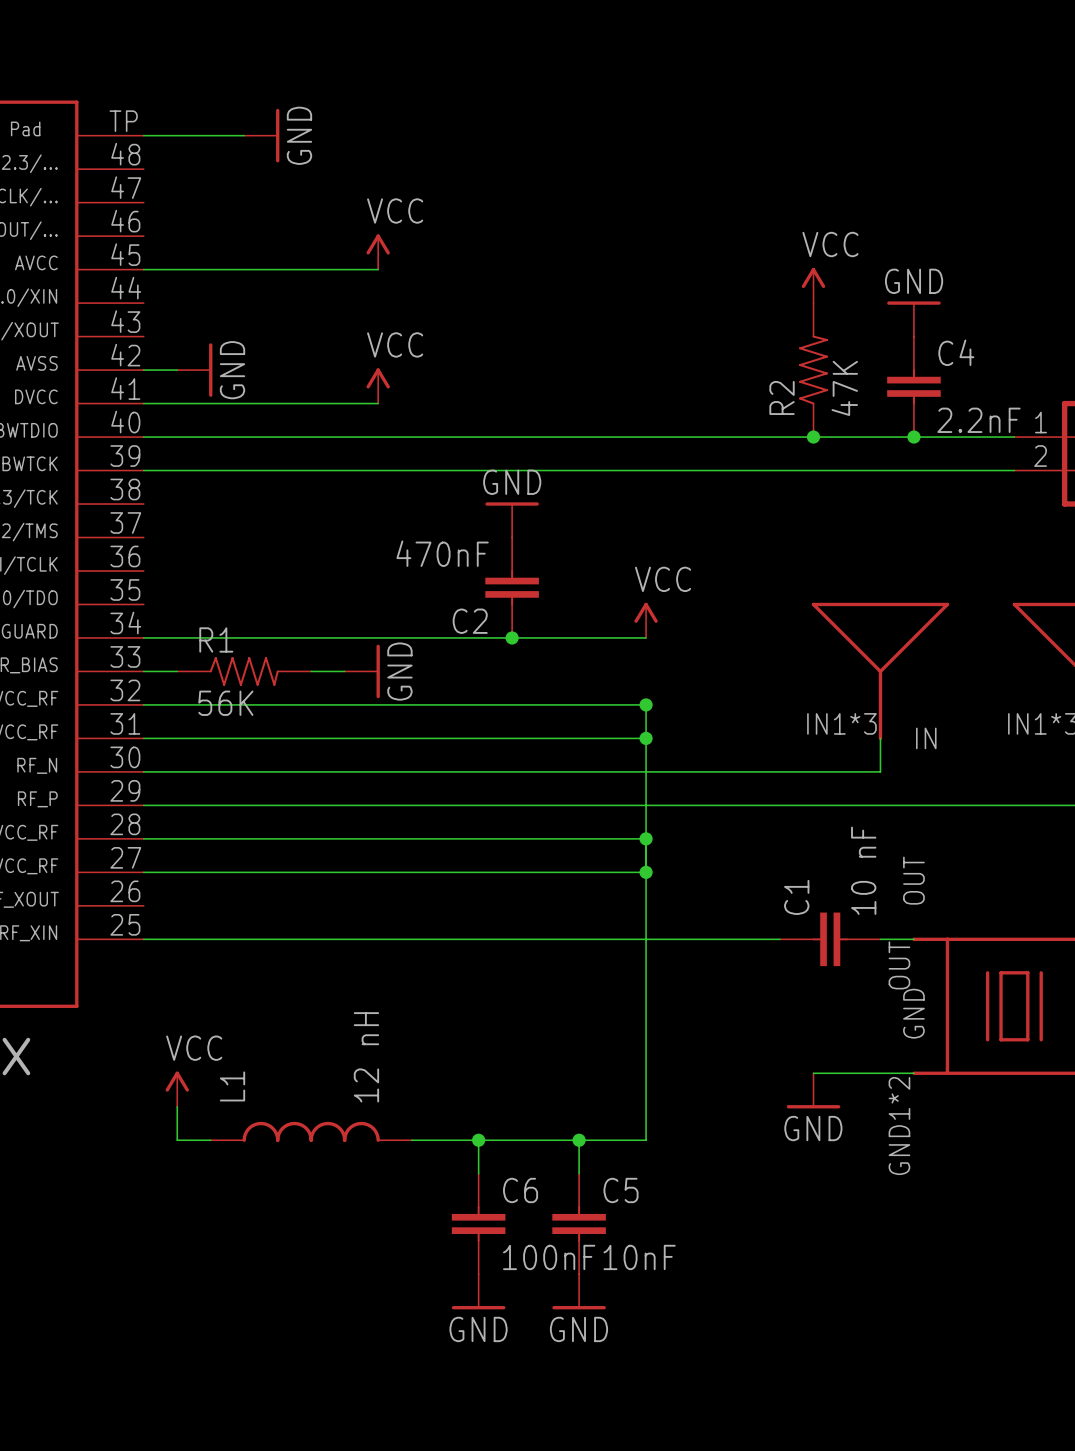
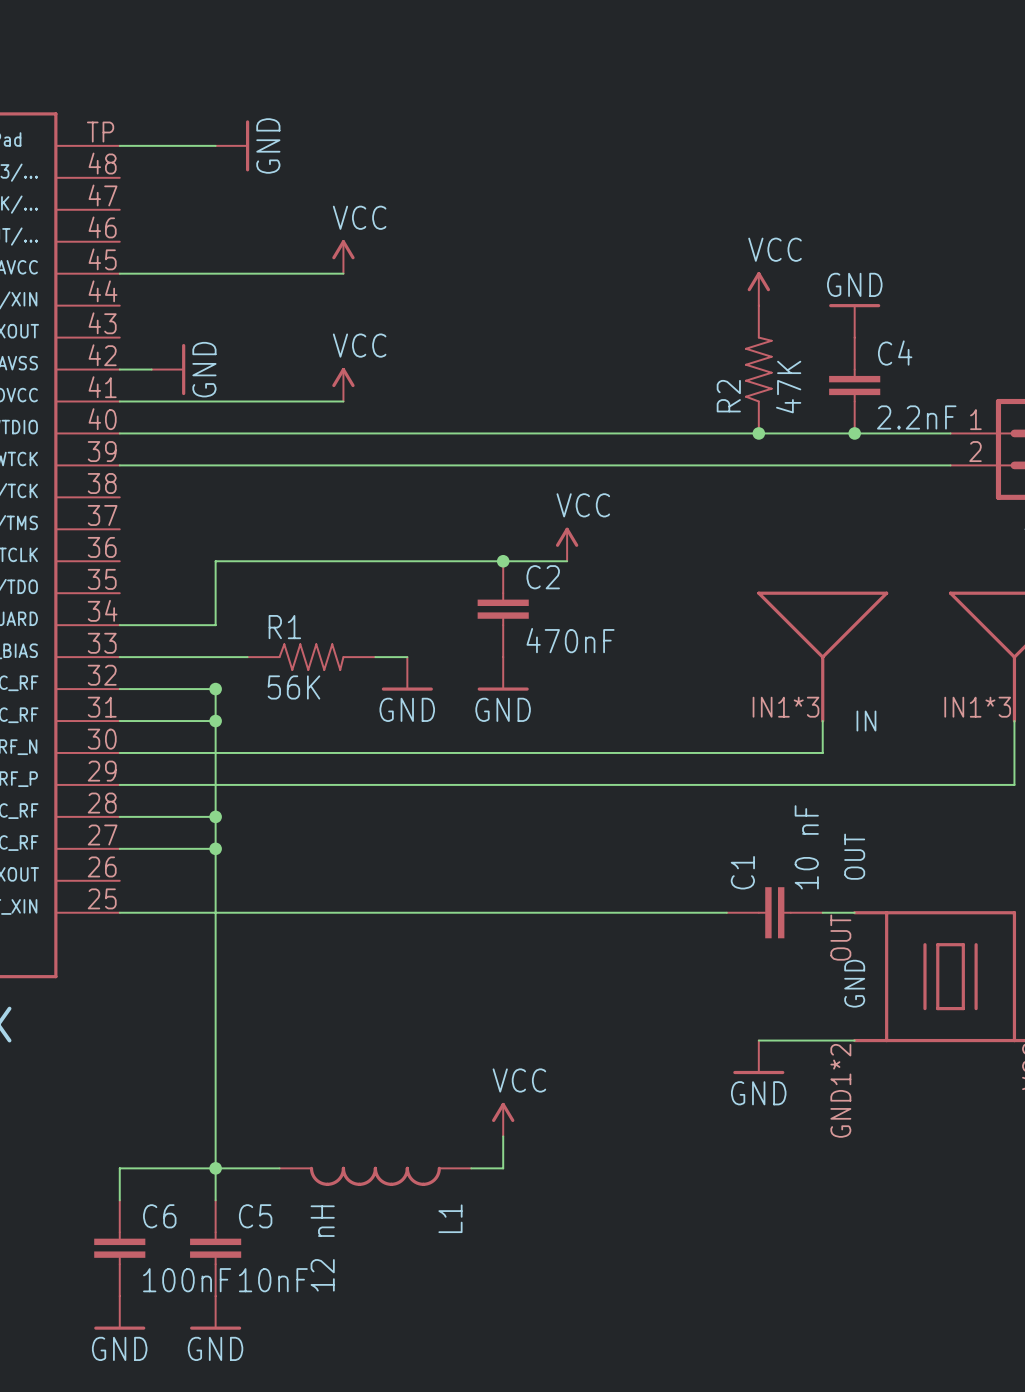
power symbol: GND (512, 519) -> none
C2 value position: 470nF (442, 553) -> 470nF (570, 640)
C2 position: (512, 587) -> (503, 609)
power symbol position: VCC (646, 620) -> VCC (567, 544)
C2 name position: C2 (470, 621) -> C2 (543, 577)
wire: (244, 637) (646, 637) -> (215, 625) (215, 561) (567, 561)
junction position: (512, 637) -> (503, 561)
R1 position: (244, 671) -> (311, 657)
wire: (311, 671) (344, 671) -> (375, 657) (407, 657)
power symbol position: GND (362, 671) -> GND (407, 673)
power symbol rotation: 0° (378, 671) -> 90° clockwise (407, 689)
power symbol: none -> GND (503, 673)
wire: (244, 704) (646, 704) (646, 1140) (411, 1140) -> (215, 689) (215, 1200)
junction: none -> (215, 689)
junction: (646, 704) -> none
wire: (244, 738) (646, 738) -> none
junction: none -> (215, 721)
junction: (646, 738) -> none
wire: (244, 838) (646, 838) -> none
junction: none -> (215, 816)
junction: (646, 838) -> none
wire: (244, 872) (646, 872) -> none
junction: none -> (215, 848)
junction: (646, 872) -> none
power symbol: VCC (177, 1089) -> none
wire: (177, 1106) (177, 1140) (210, 1140) -> none
L1 rotation: 0° (311, 1131) -> 180° (375, 1176)
L1 position: (311, 1131) -> (375, 1176)
wire: (478, 1140) (478, 1173) -> none
junction: (478, 1140) -> none
wire: (579, 1140) (579, 1173) -> none
junction: (579, 1140) -> none
power symbol: none -> VCC (503, 1119)
wire: none -> (503, 1136) (503, 1168) (471, 1168)
junction: none -> (215, 1168)
wire: none -> (279, 1168) (119, 1168) (119, 1200)
C6 position: (478, 1223) -> (119, 1248)
C5 position: (579, 1223) -> (215, 1248)
power symbol: GND (478, 1291) -> none
power symbol: GND (579, 1291) -> none
power symbol: none -> GND (119, 1312)
power symbol: none -> GND (215, 1312)

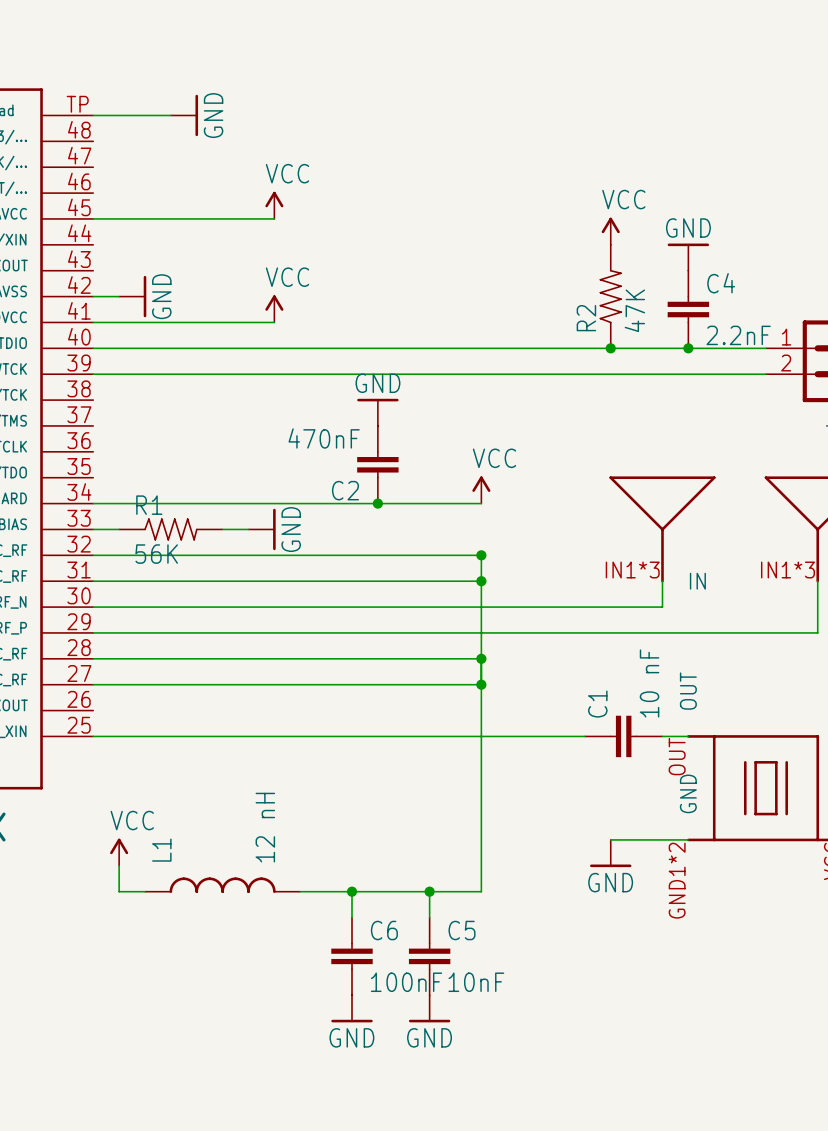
power symbol: none -> GND (377, 412)
power symbol position: VCC (567, 544) -> VCC (481, 490)
junction position: (503, 561) -> (377, 503)
wire: (567, 561) (215, 561) (215, 625) -> (481, 503) (170, 503)
C2 name position: C2 (543, 577) -> C2 (345, 490)
C2 position: (503, 609) -> (377, 464)
C2 value position: 470nF (570, 640) -> 470nF (324, 438)
R1 position: (311, 657) -> (170, 529)
wire: (375, 657) (407, 657) -> (222, 529) (248, 529)
power symbol position: GND (407, 673) -> GND (262, 529)
power symbol: GND (503, 673) -> none
wire: (215, 689) (215, 1200) -> (170, 555) (481, 555) (481, 891) (300, 891)
junction: (215, 689) -> none
power symbol rotation: 0° (407, 689) -> 90° counterclockwise (274, 529)
junction: none -> (481, 555)
wire: none -> (170, 581) (481, 581)
junction: (215, 721) -> none
junction: none -> (481, 581)
wire: none -> (170, 658) (481, 658)
junction: (215, 816) -> none
junction: none -> (481, 658)
wire: none -> (170, 684) (481, 684)
junction: (215, 848) -> none
junction: none -> (481, 684)
power symbol: none -> VCC (119, 852)
wire: none -> (119, 865) (119, 891) (145, 891)
wire: none -> (352, 891) (352, 917)
junction: none -> (352, 891)
wire: none -> (429, 891) (429, 917)
junction: none -> (429, 891)
power symbol: VCC (503, 1119) -> none
wire: (503, 1136) (503, 1168) (471, 1168) -> none
junction: (215, 1168) -> none
wire: (279, 1168) (119, 1168) (119, 1200) -> none
L1 rotation: 0° (375, 1176) -> 180° (222, 885)
L1 position: (375, 1176) -> (222, 885)
C6 position: (119, 1248) -> (352, 956)
C5 position: (215, 1248) -> (429, 956)
power symbol: none -> GND (352, 1008)
power symbol: none -> GND (429, 1008)
power symbol: GND (119, 1312) -> none
power symbol: GND (215, 1312) -> none

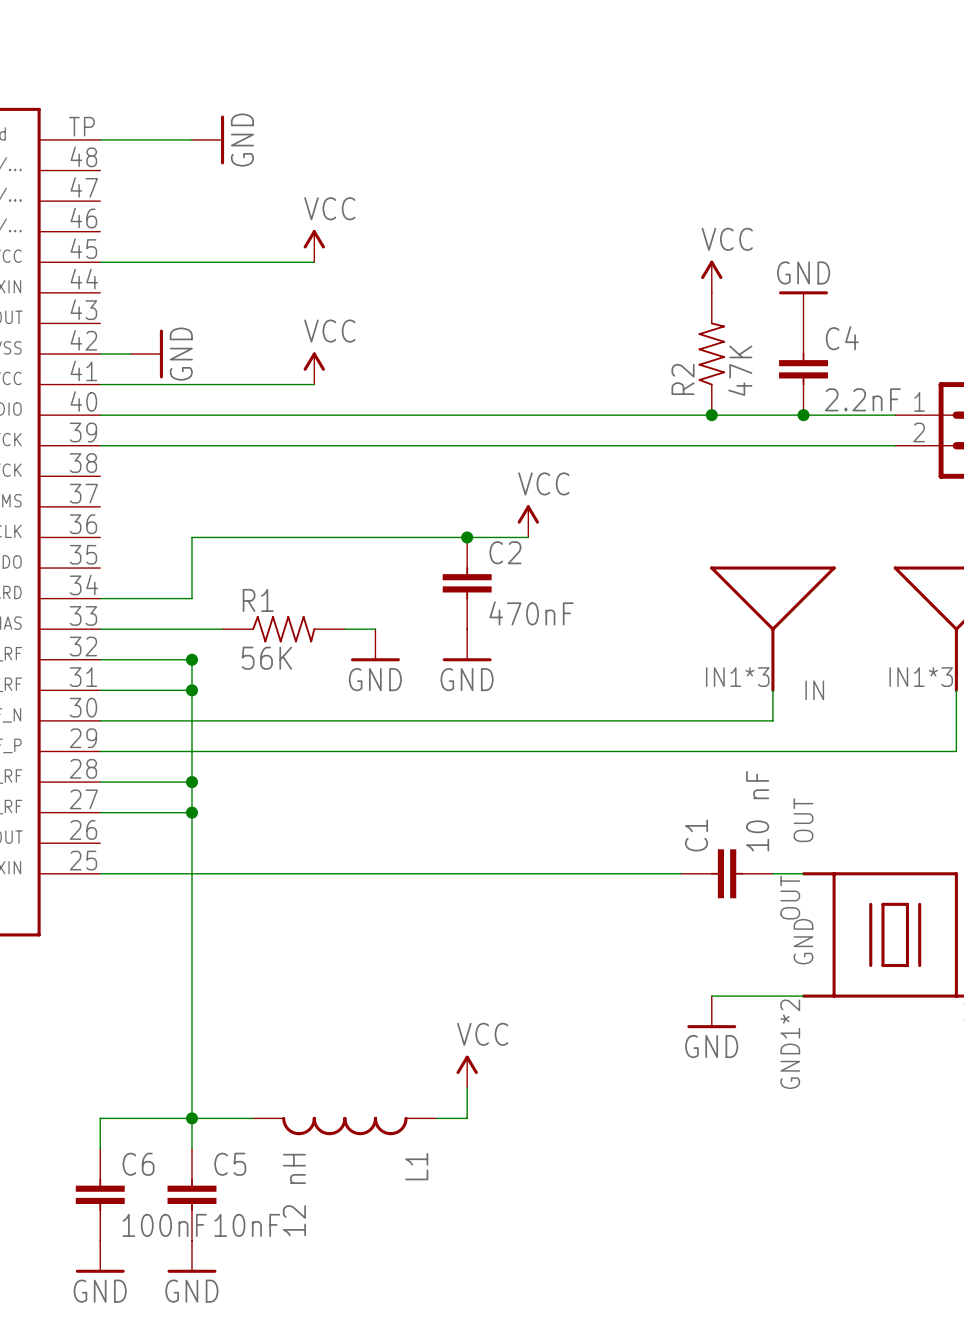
power symbol: GND (377, 412) -> none
C2 value position: 470nF (324, 438) -> 470nF (531, 613)
C2 position: (377, 464) -> (467, 583)
C2 name position: C2 (345, 490) -> C2 (505, 552)
power symbol position: VCC (481, 490) -> VCC (528, 521)
wire: (170, 503) (481, 503) -> (191, 598) (191, 537) (528, 537)
junction position: (377, 503) -> (467, 537)
wire: none -> (130, 629) (222, 629)
R1 position: (170, 529) -> (283, 629)
wire: (222, 529) (248, 529) -> (344, 629) (375, 629)
power symbol position: GND (262, 529) -> GND (375, 645)
power symbol rotation: 0° (274, 529) -> 90° clockwise (375, 659)
power symbol: none -> GND (467, 645)
wire: (170, 555) (481, 555) (481, 891) (300, 891) -> (191, 659) (191, 1148)
junction: none -> (191, 659)
junction: (481, 555) -> none
wire: (170, 581) (481, 581) -> none
junction: none -> (191, 690)
junction: (481, 581) -> none
wire: (170, 658) (481, 658) -> none
junction: none -> (191, 782)
junction: (481, 658) -> none
wire: (170, 684) (481, 684) -> none
junction: none -> (191, 812)
junction: (481, 684) -> none
power symbol: VCC (119, 852) -> none
wire: (119, 865) (119, 891) (145, 891) -> none
L1 rotation: 0° (222, 885) -> 180° (344, 1126)
L1 position: (222, 885) -> (344, 1126)
wire: (352, 891) (352, 917) -> none
junction: (352, 891) -> none
wire: (429, 891) (429, 917) -> none
junction: (429, 891) -> none
power symbol: none -> VCC (467, 1071)
wire: none -> (467, 1087) (467, 1118) (436, 1118)
junction: none -> (191, 1118)
wire: none -> (253, 1118) (100, 1118) (100, 1148)
C6 position: (352, 956) -> (100, 1194)
C5 position: (429, 956) -> (191, 1194)
power symbol: GND (352, 1008) -> none
power symbol: GND (429, 1008) -> none
power symbol: none -> GND (100, 1256)
power symbol: none -> GND (191, 1256)

